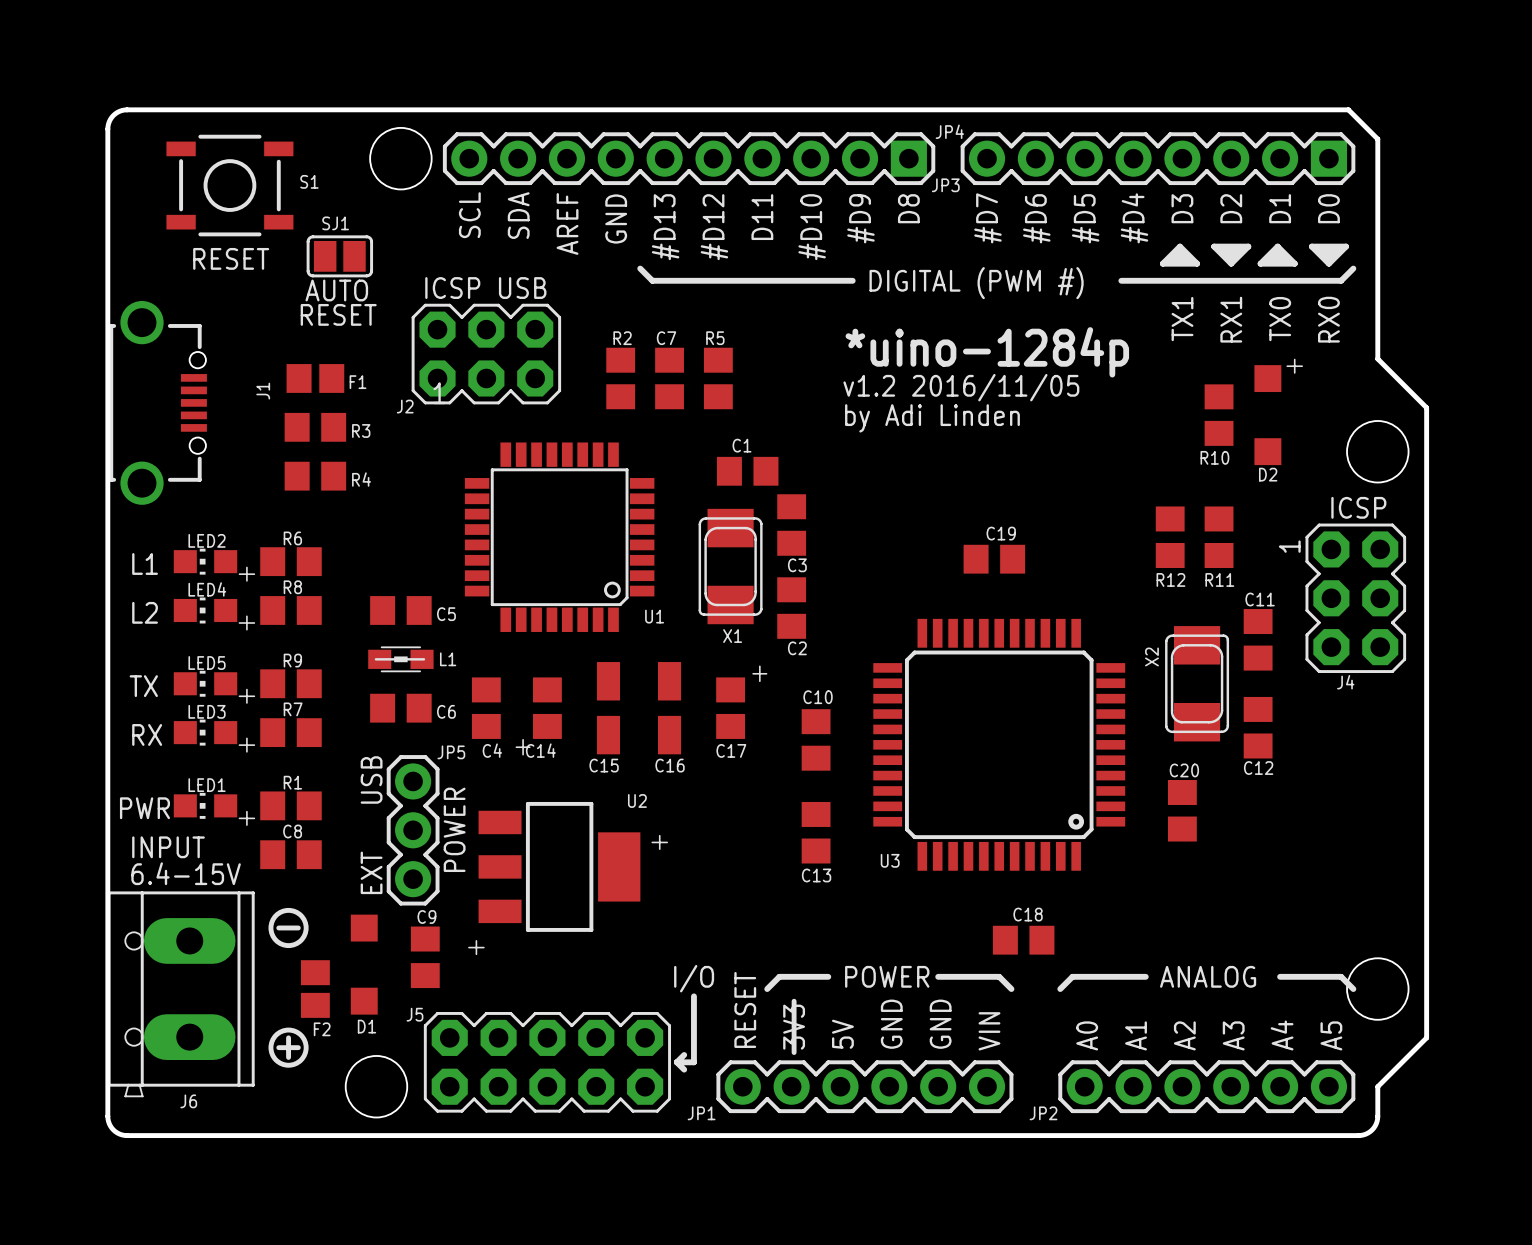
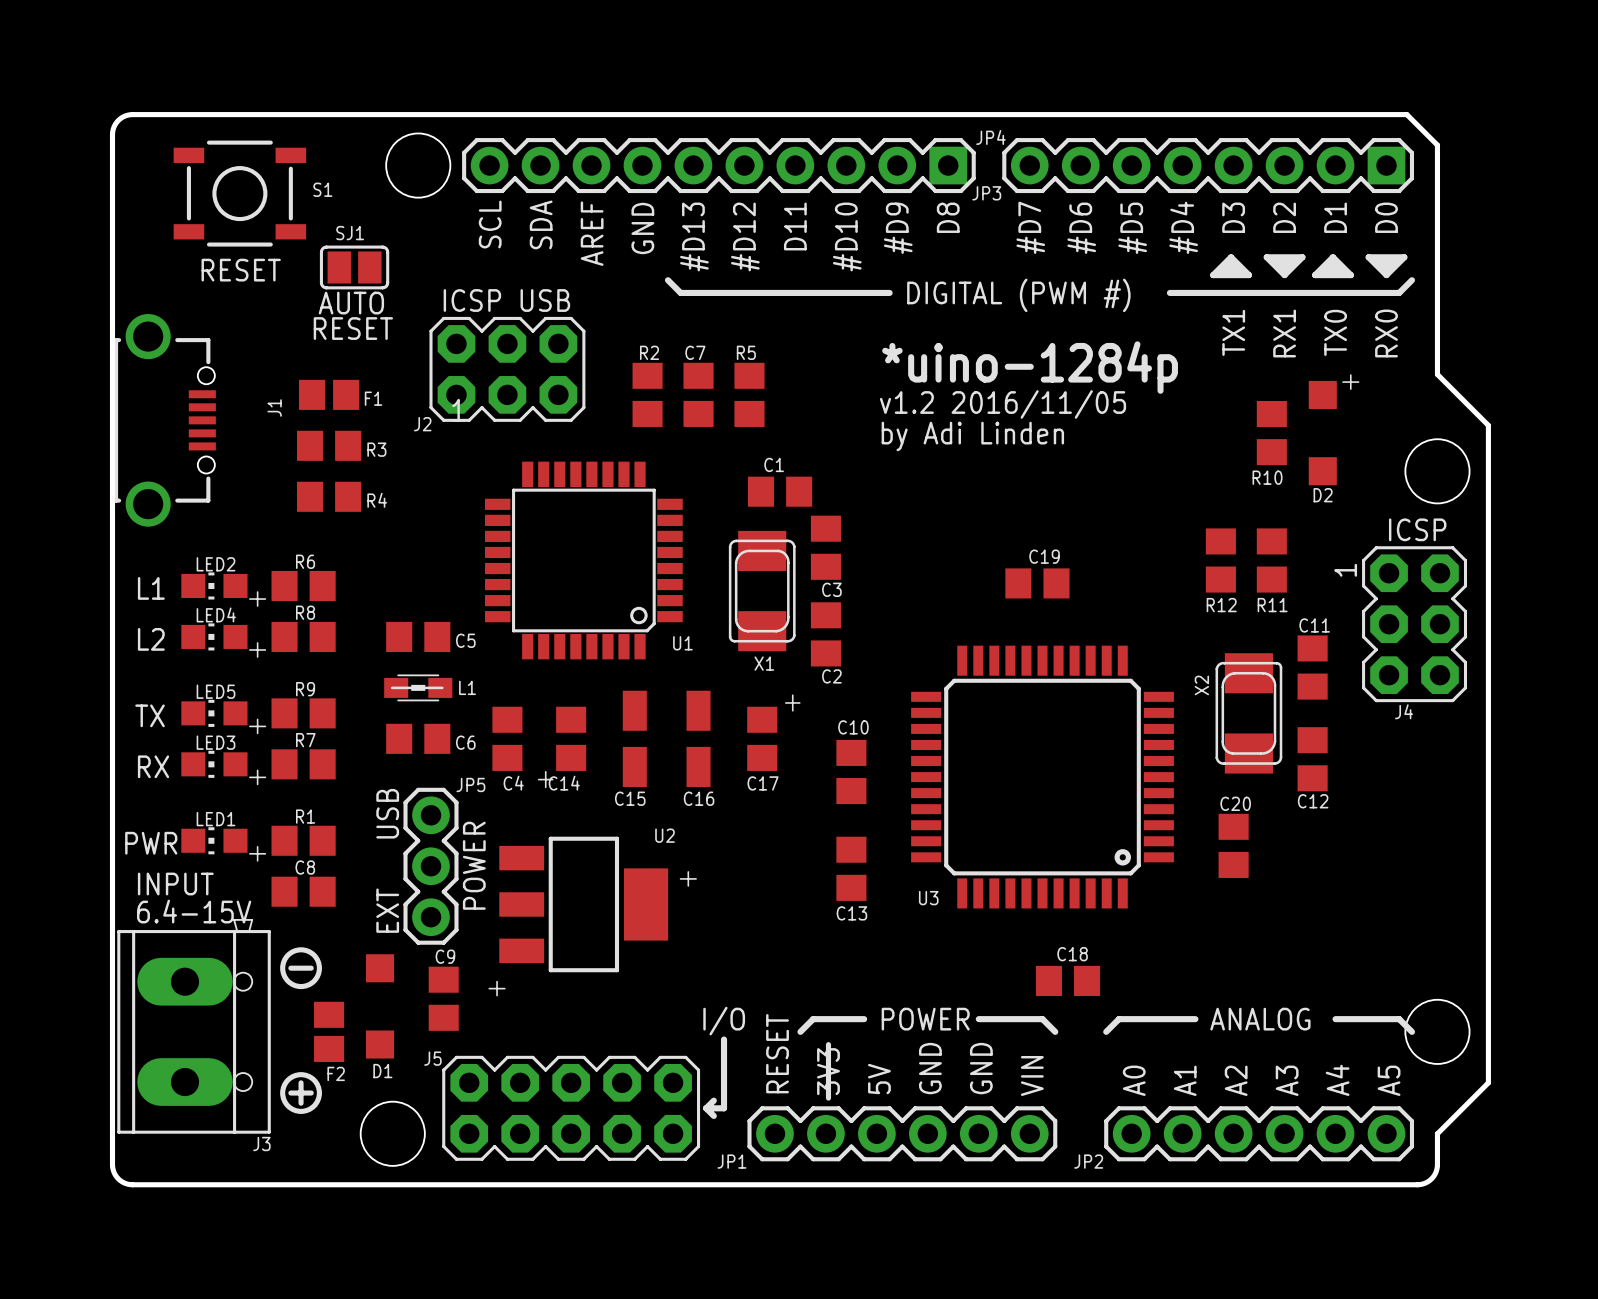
J3: none -> (194, 1026)
J6: (181, 994) -> none

